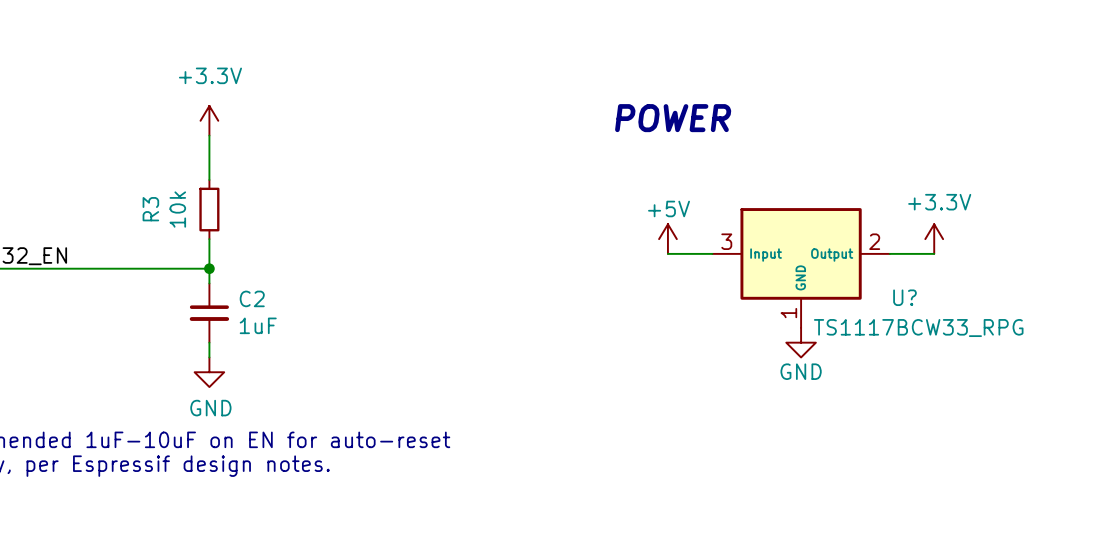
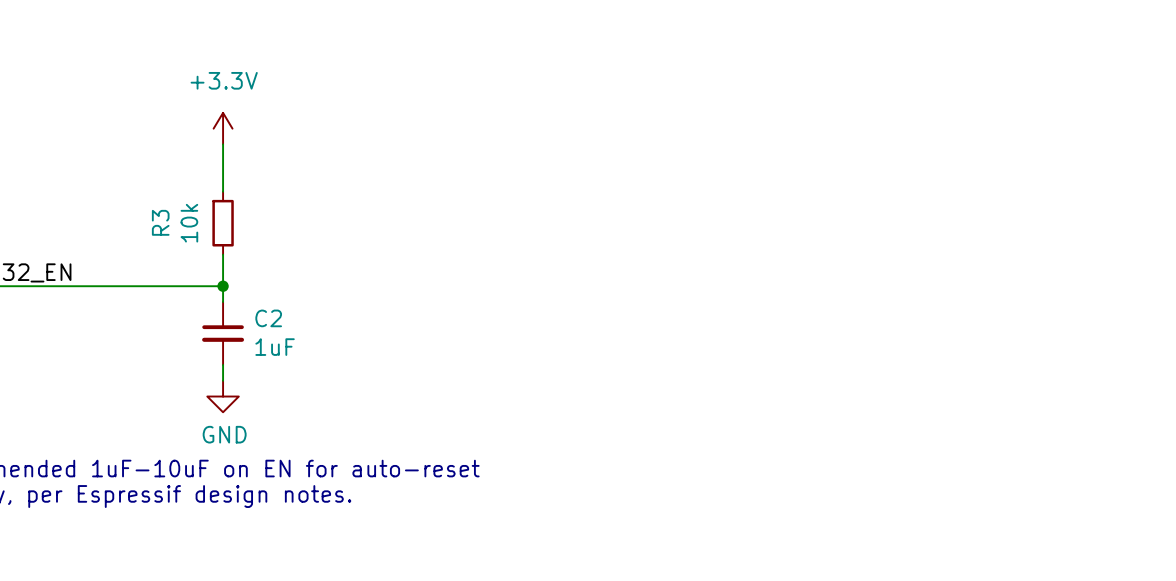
text: POWER (673, 118) -> none
power symbol: +5V (667, 239) -> none
power symbol: +3.3V (934, 239) -> none
wire: (667, 253) (712, 253) -> none
wire: (889, 253) (934, 253) -> none
U?: TS1117BCW33_RPG (801, 267) -> none
power symbol: GND (801, 342) -> none

